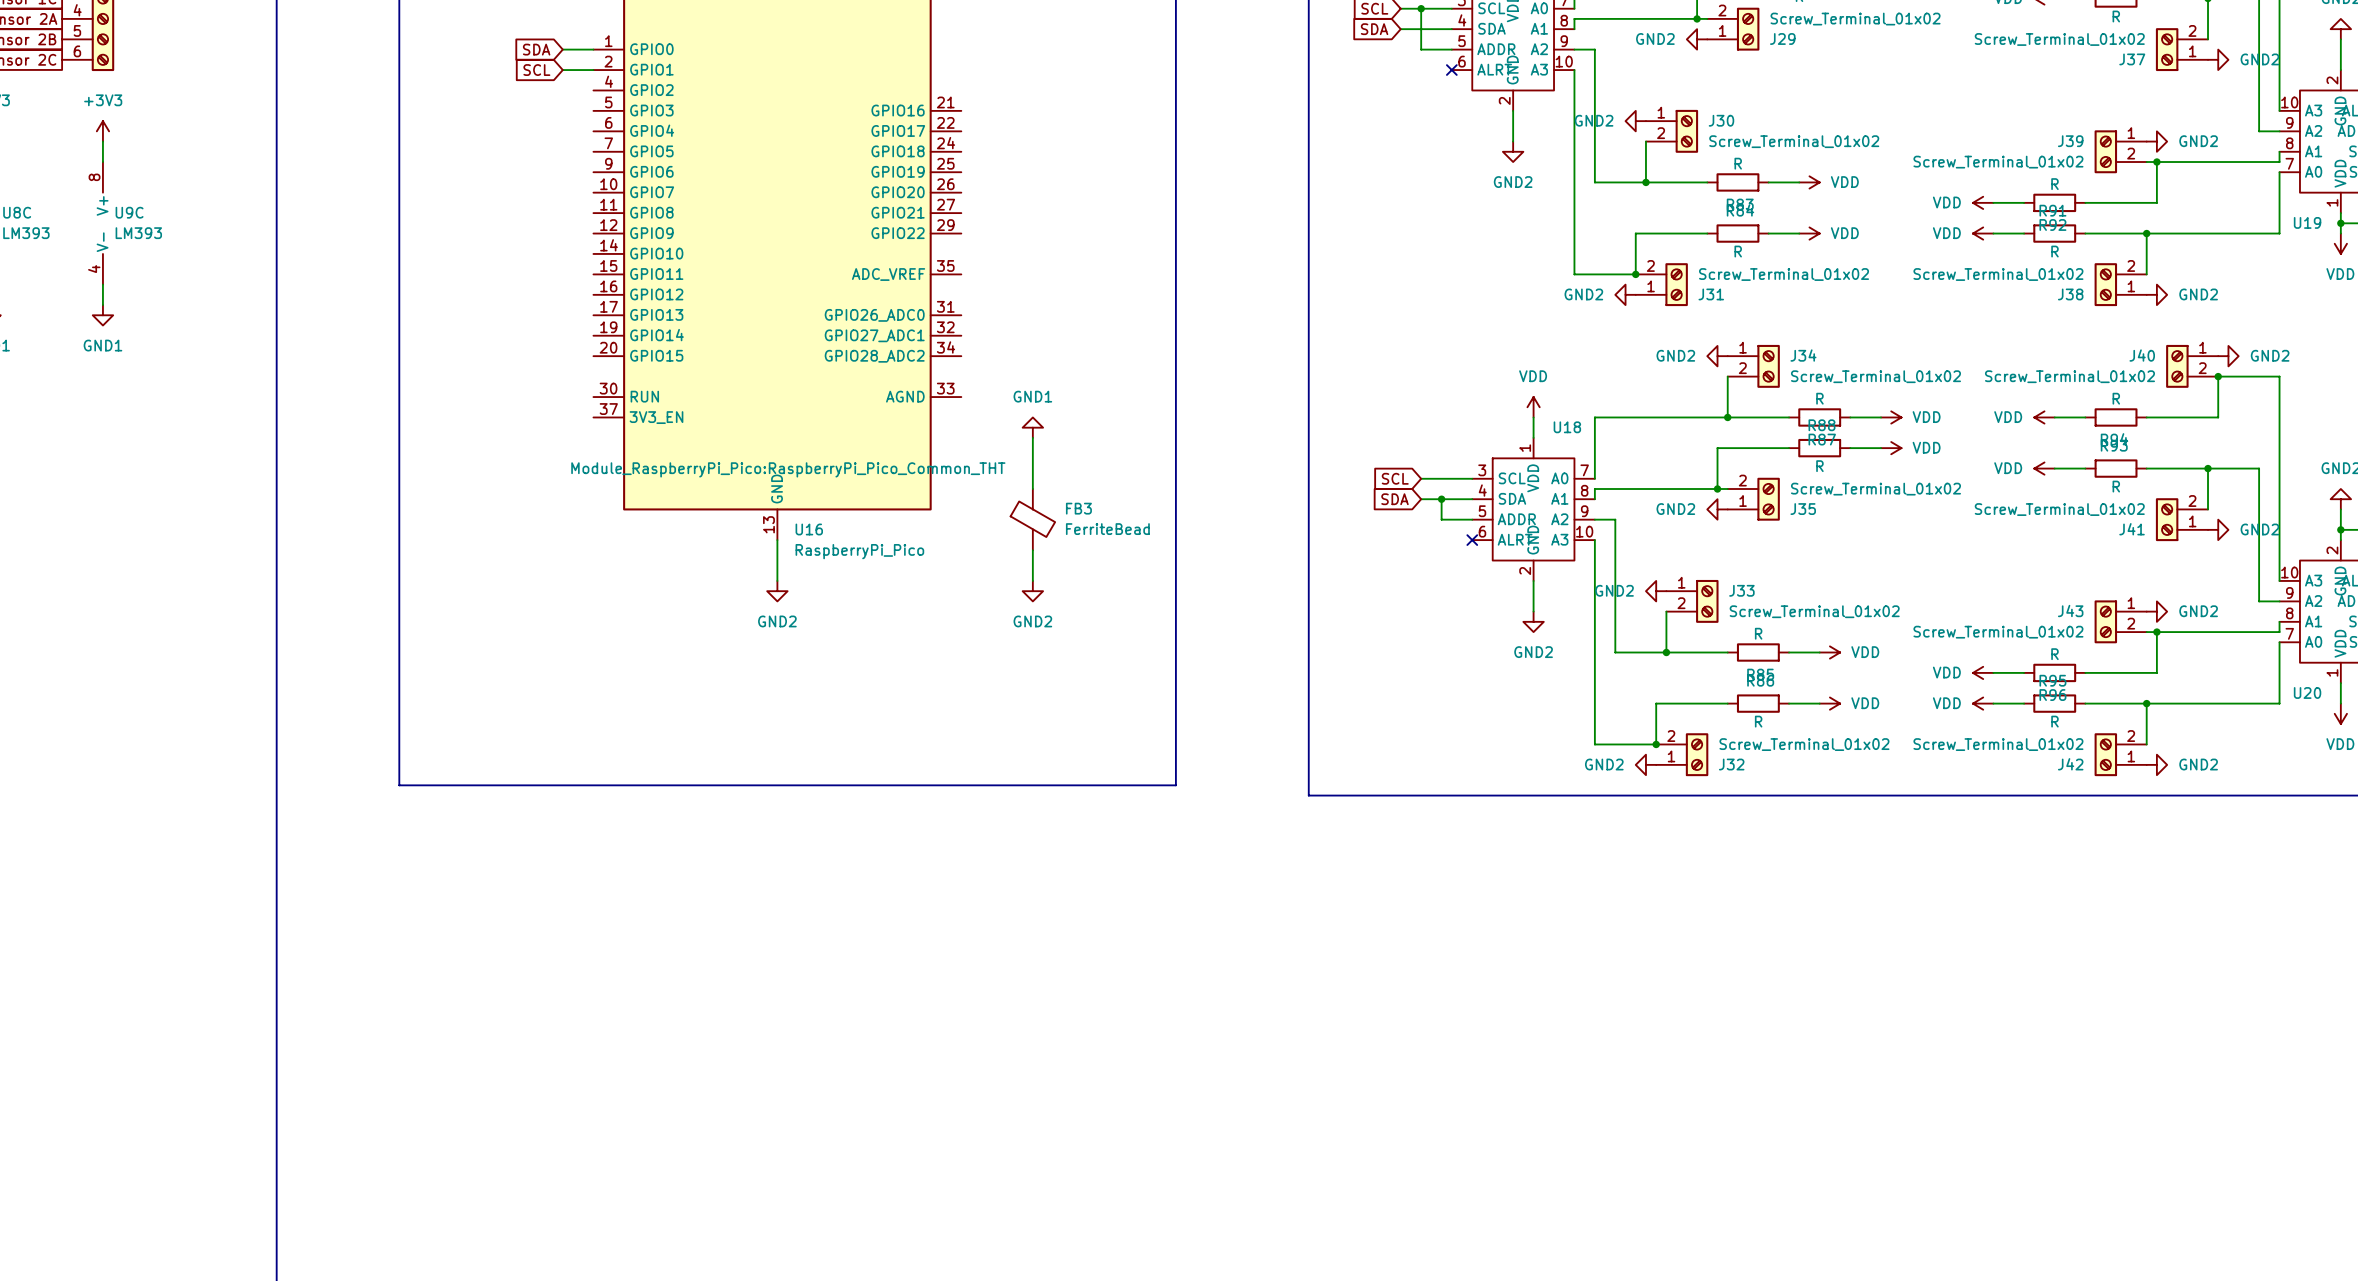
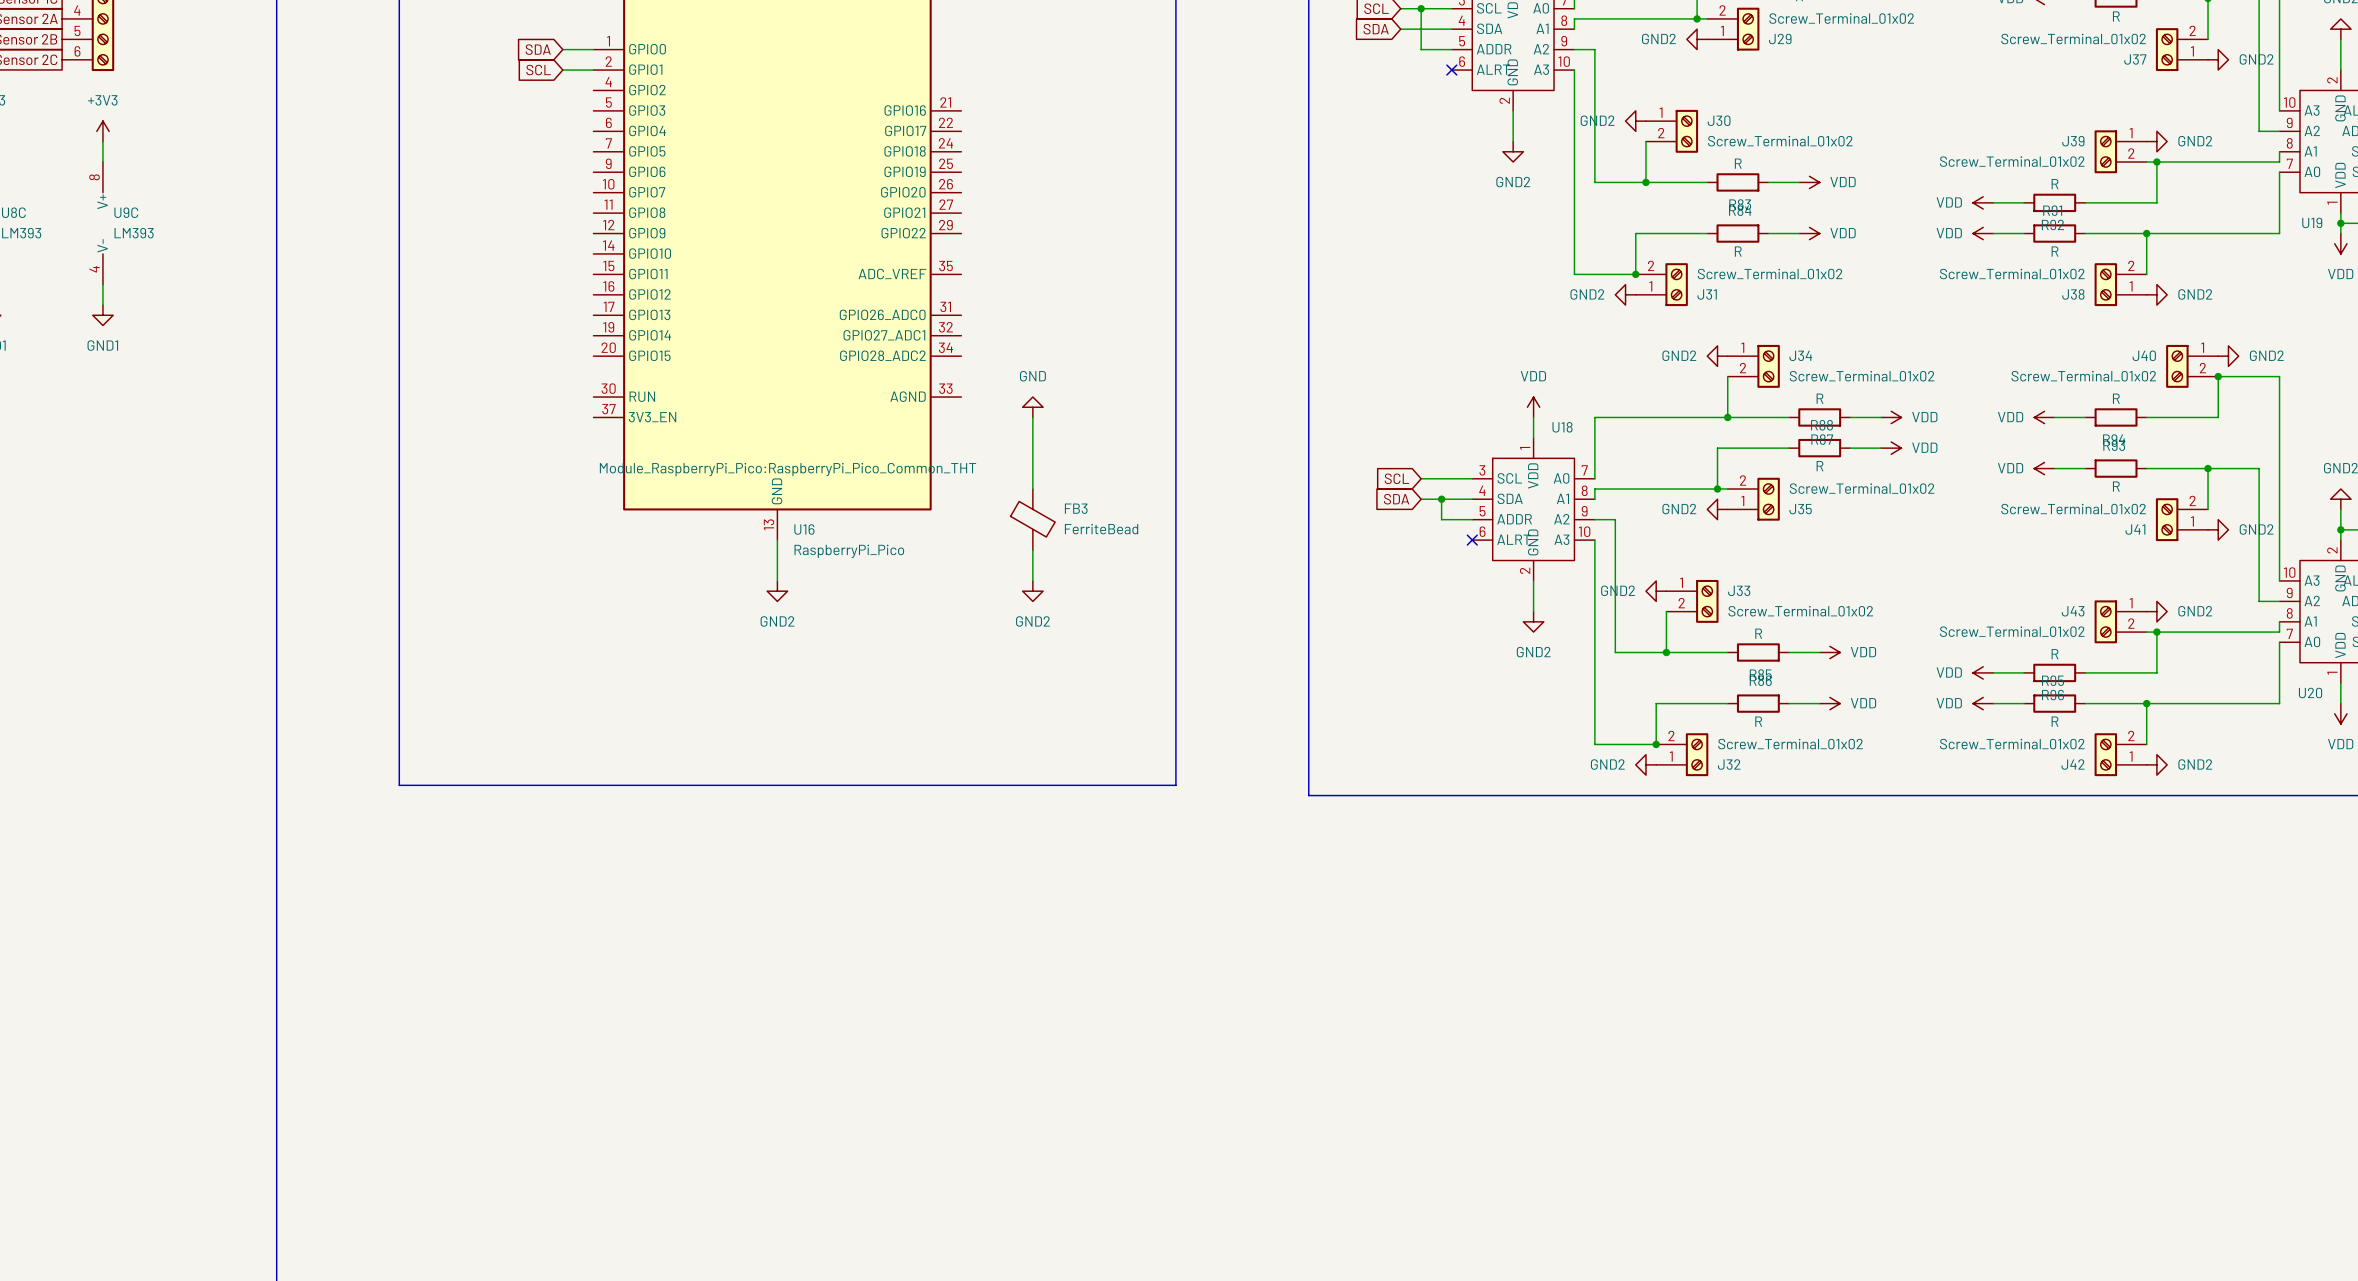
power symbol: none -> GND (1032, 407)
power symbol: GND1 (1032, 427) -> none

